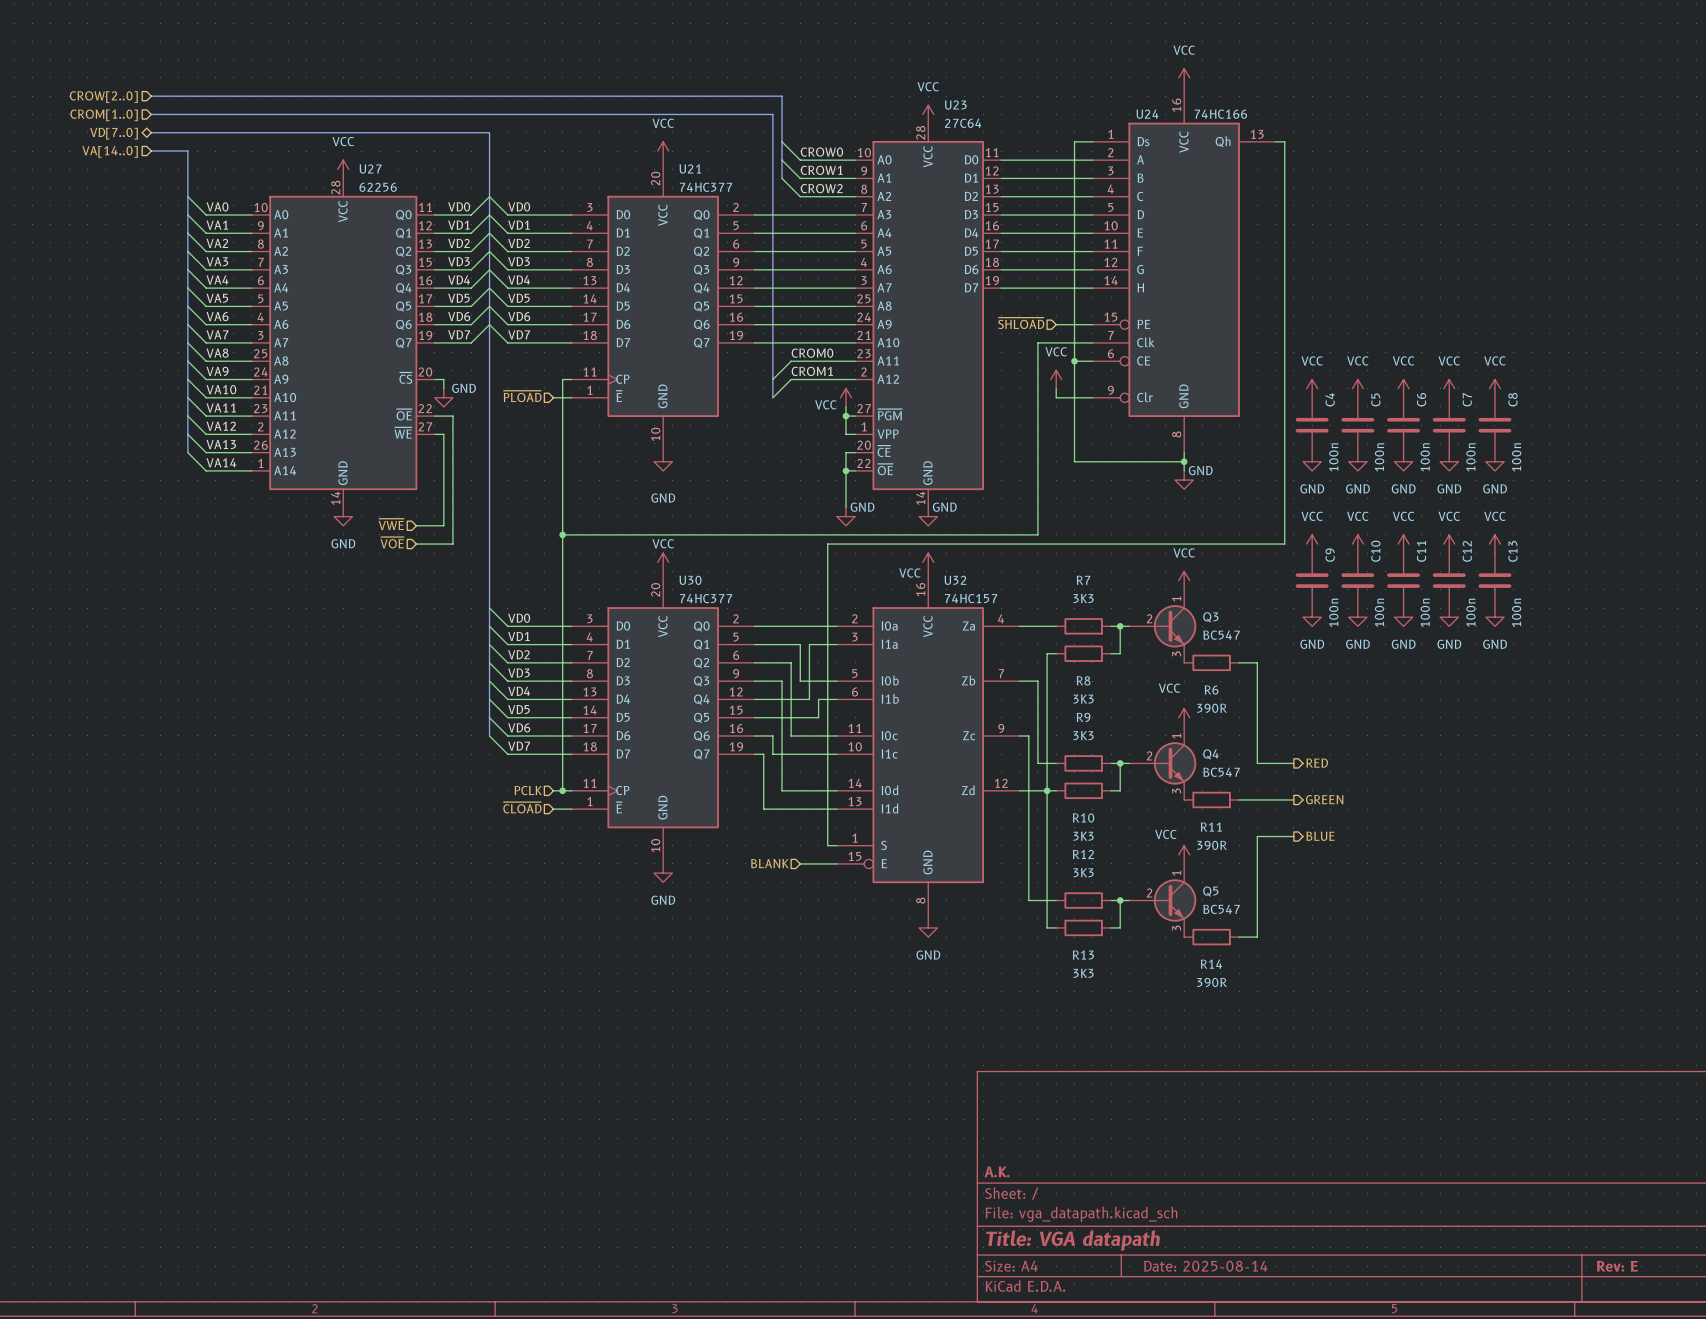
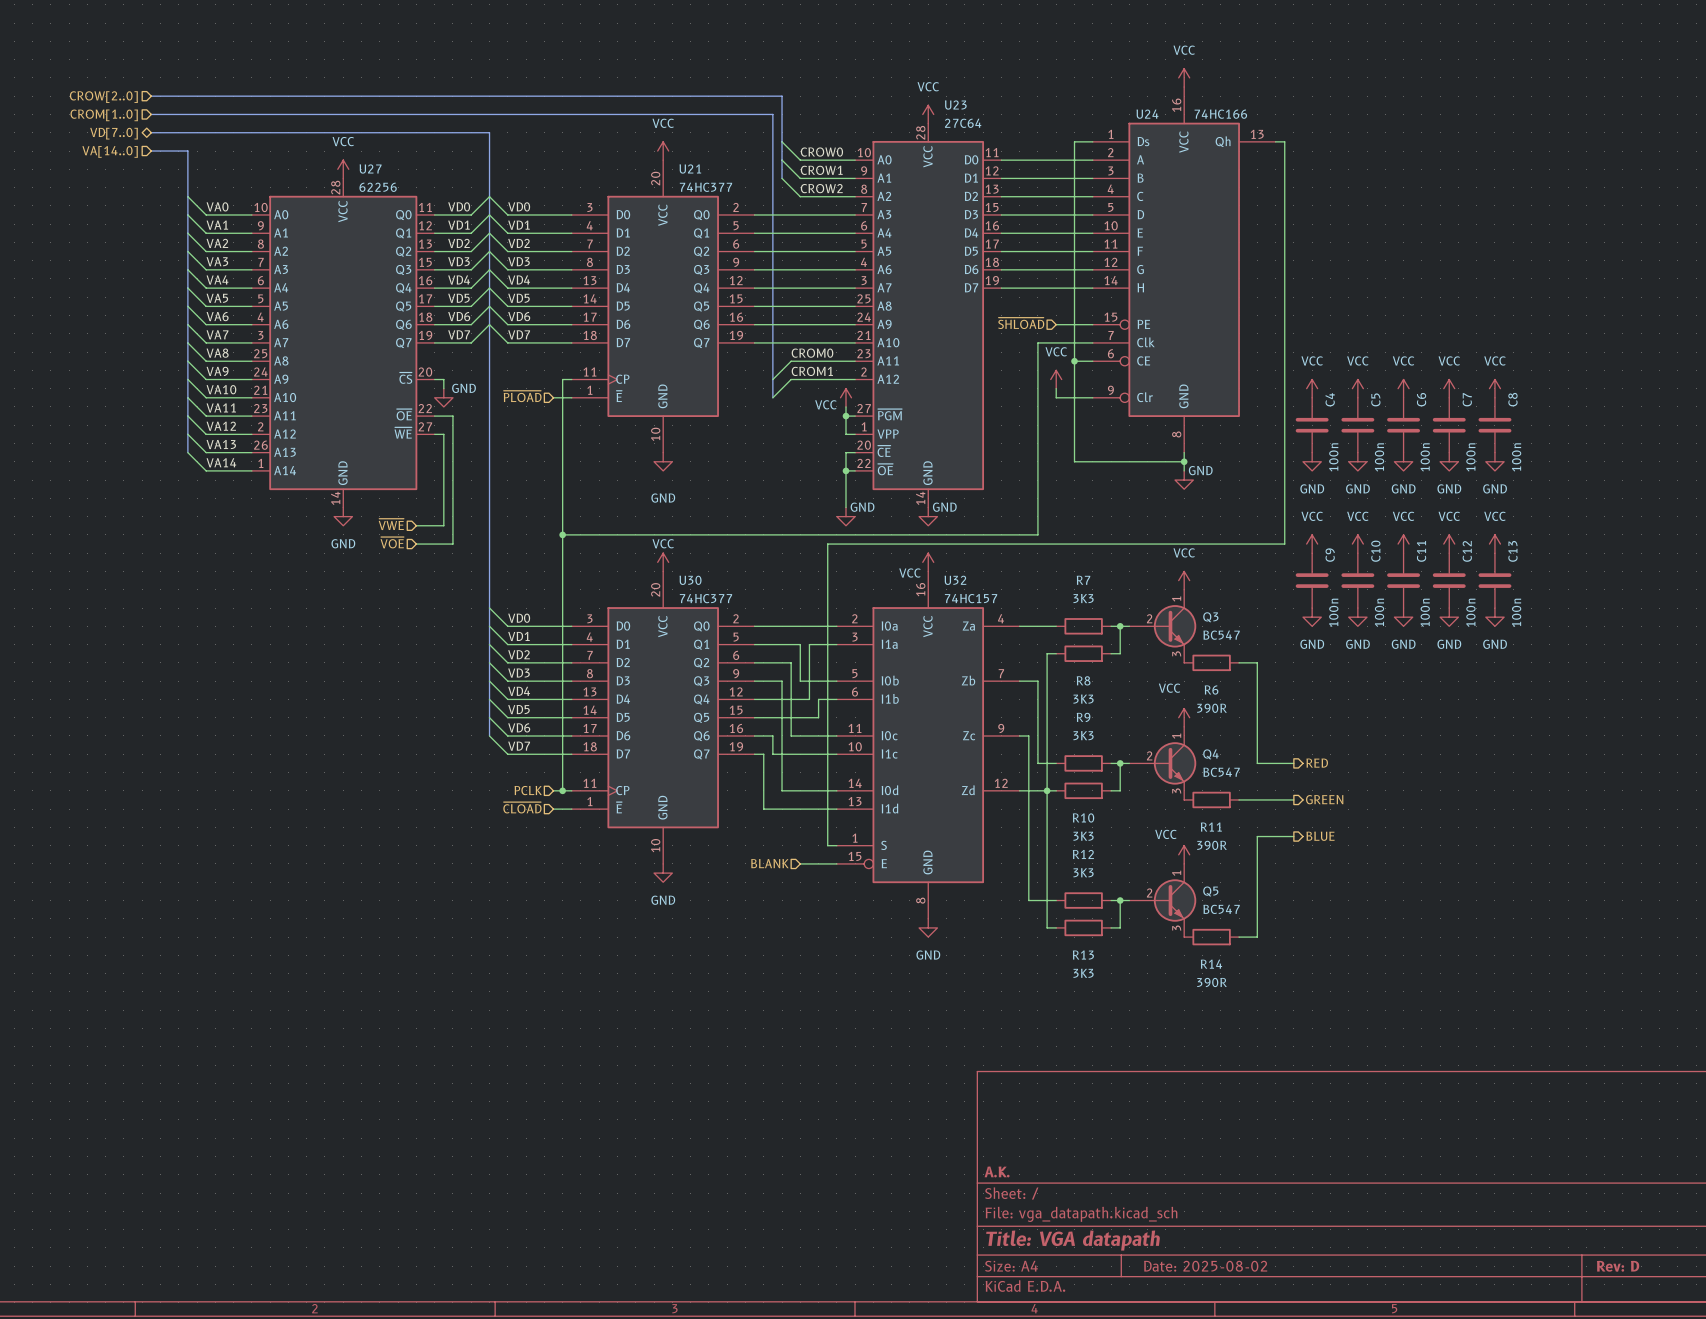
title block: Date: 2025-08-14 (1205, 1266) -> Date: 2025-08-02 (1205, 1266)
title block: Rev: E (1617, 1266) -> Rev: D (1618, 1266)

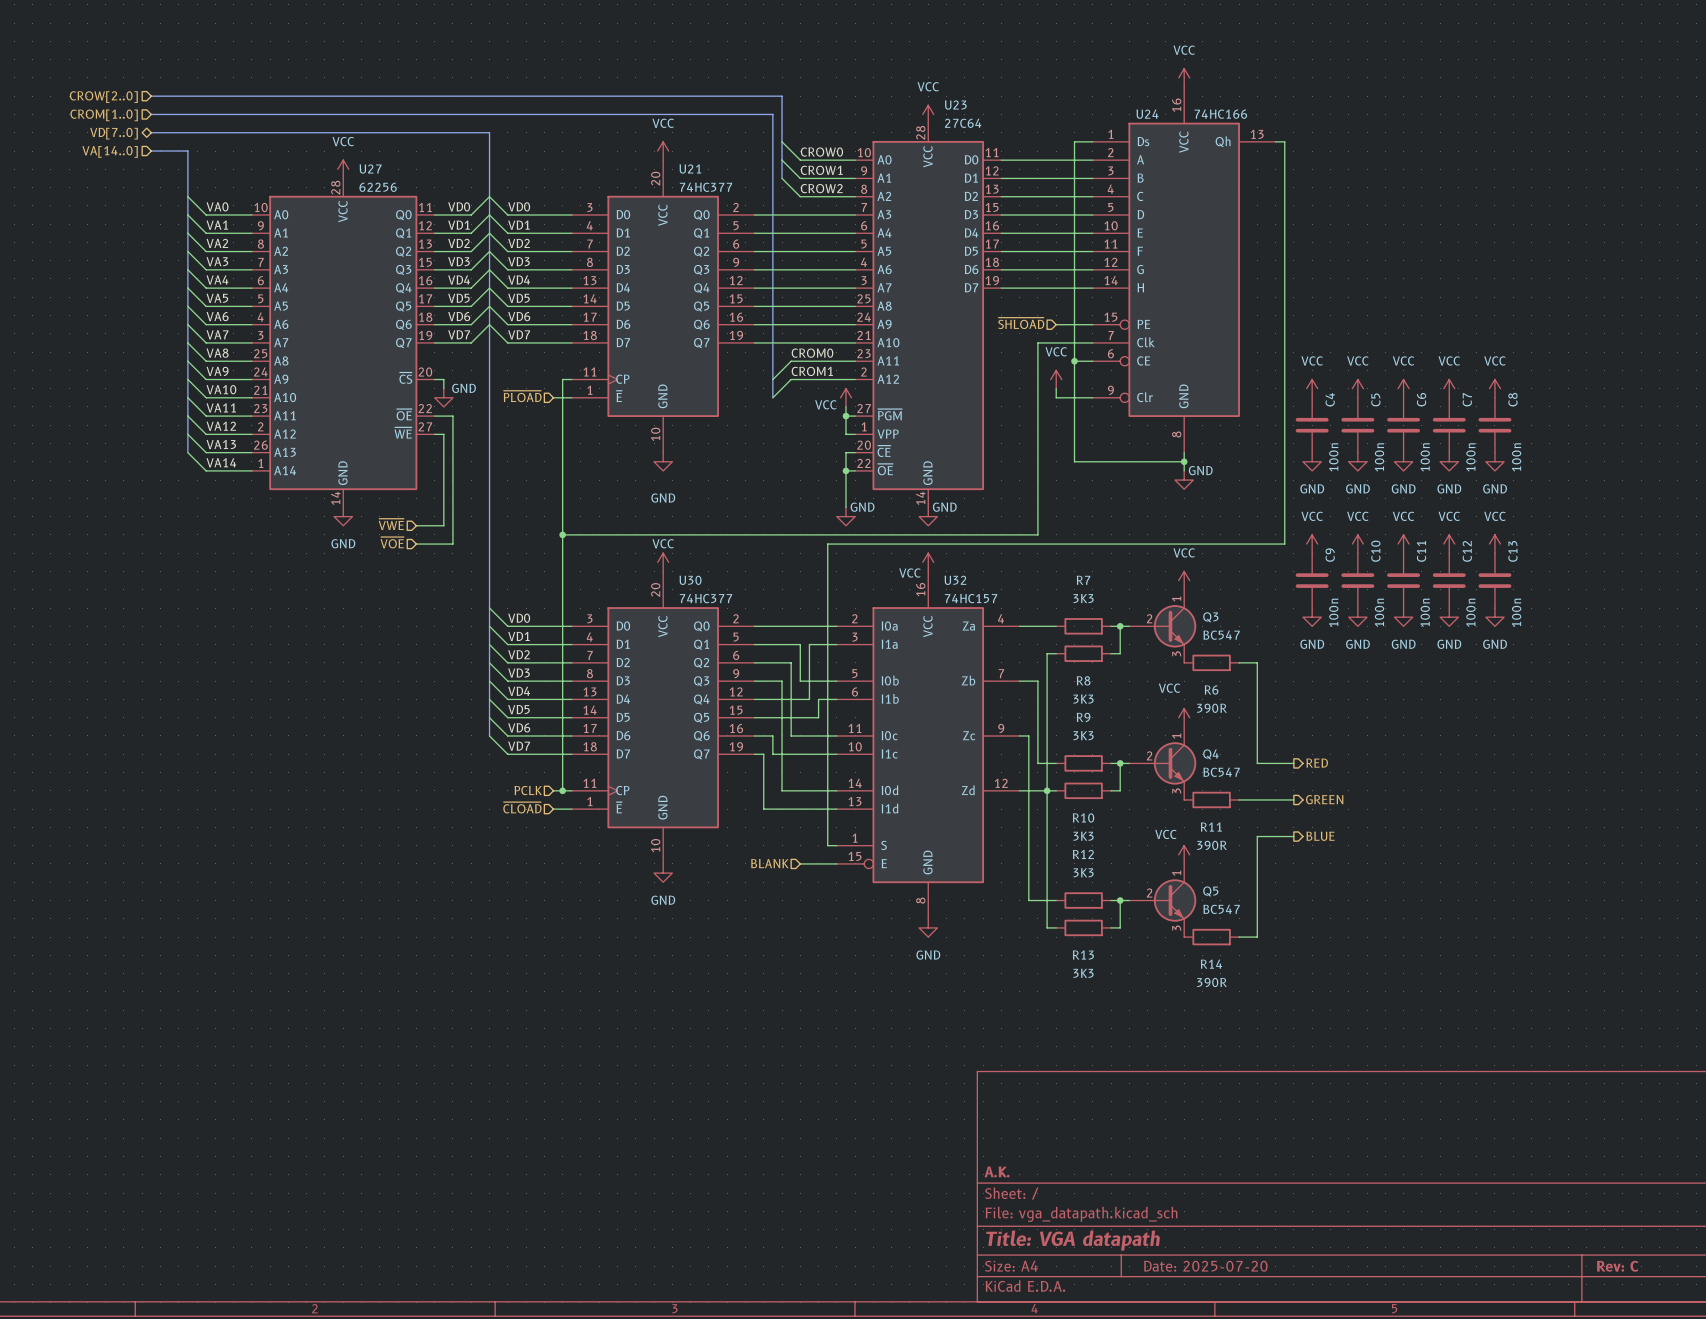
title block: Date: 2025-08-02 (1205, 1266) -> Date: 2025-07-20 (1205, 1266)
title block: Rev: D (1618, 1266) -> Rev: C (1617, 1266)

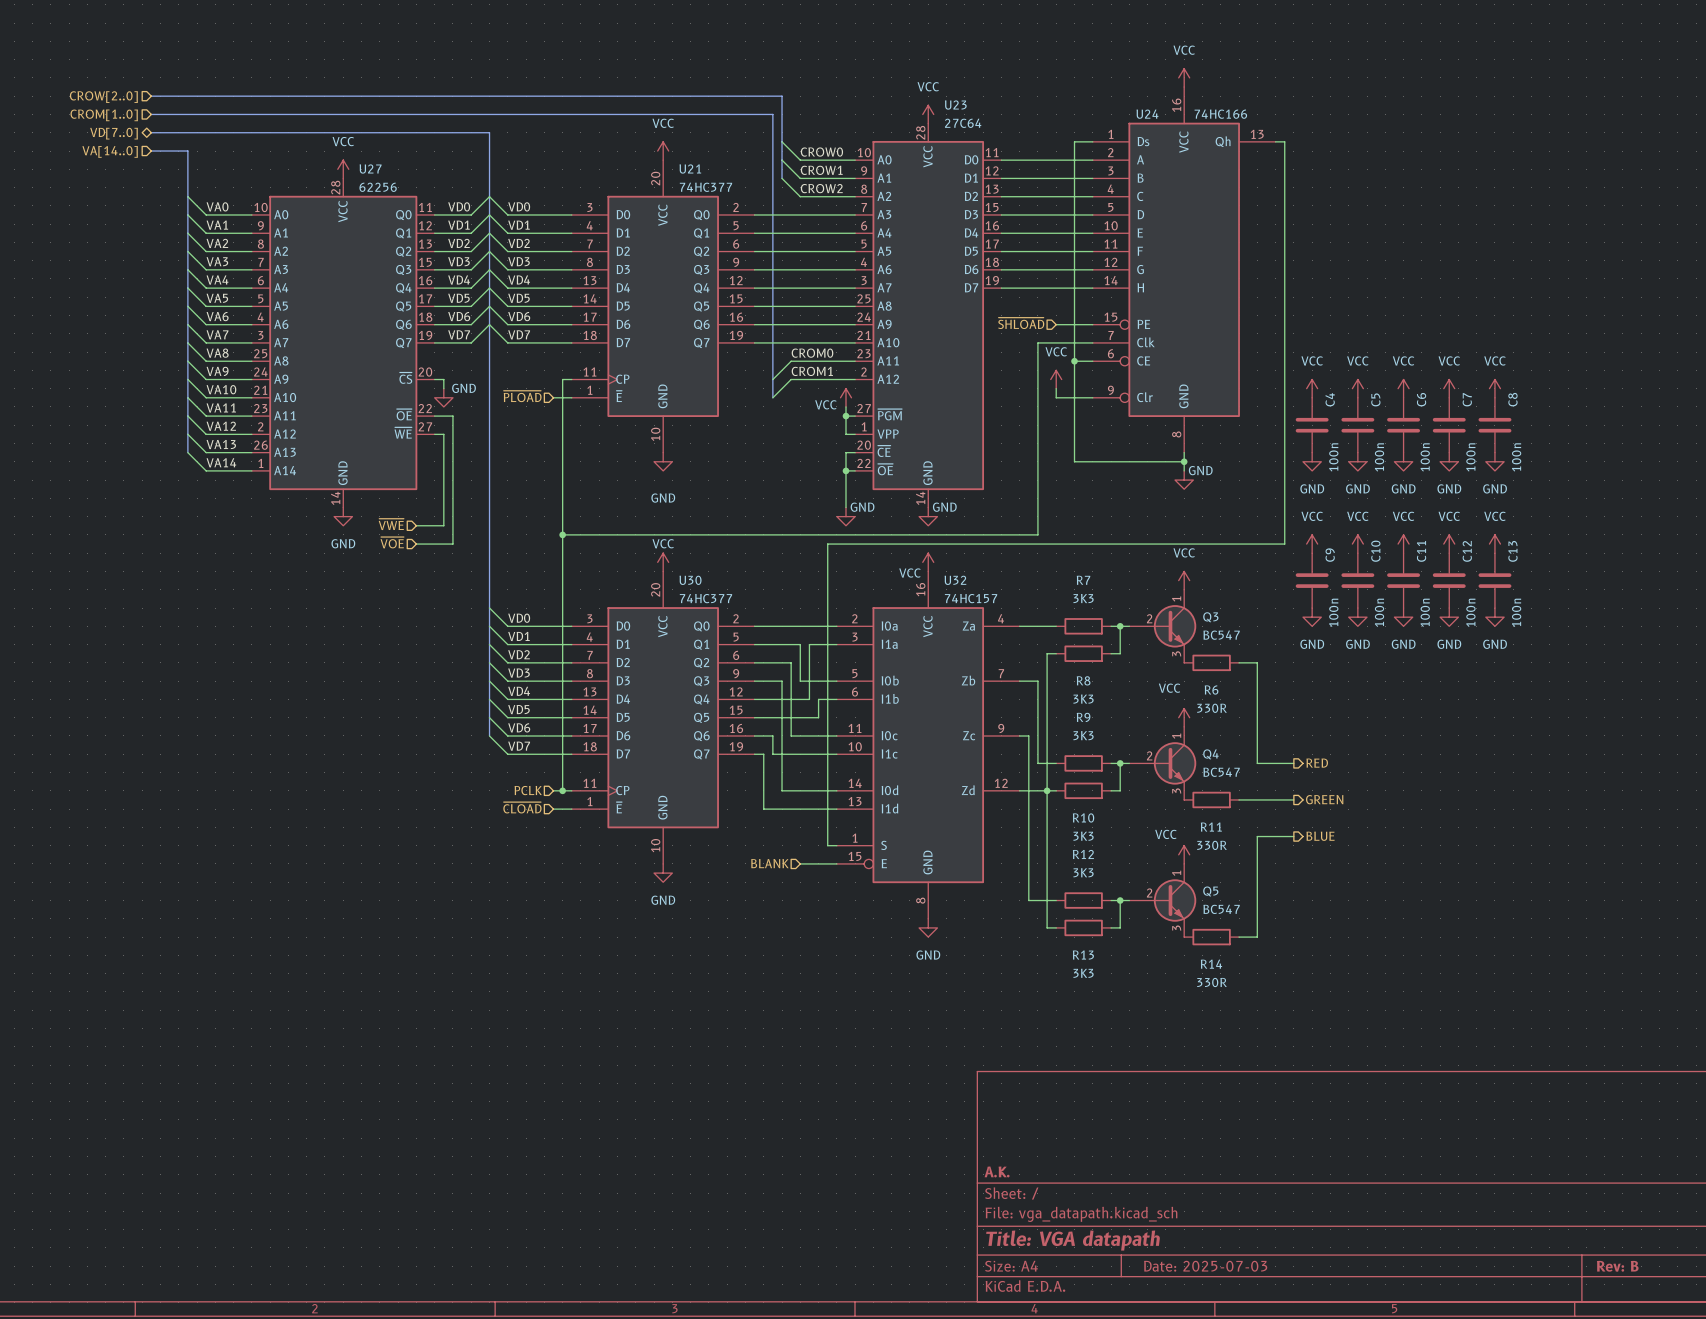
R6 value: 390R (1212, 708) -> 330R (1212, 708)
R11 value: 390R (1212, 845) -> 330R (1212, 845)
R14 value: 390R (1212, 982) -> 330R (1212, 982)
title block: Date: 2025-07-20 (1205, 1266) -> Date: 2025-07-03 (1205, 1266)
title block: Rev: C (1617, 1266) -> Rev: B (1617, 1266)

